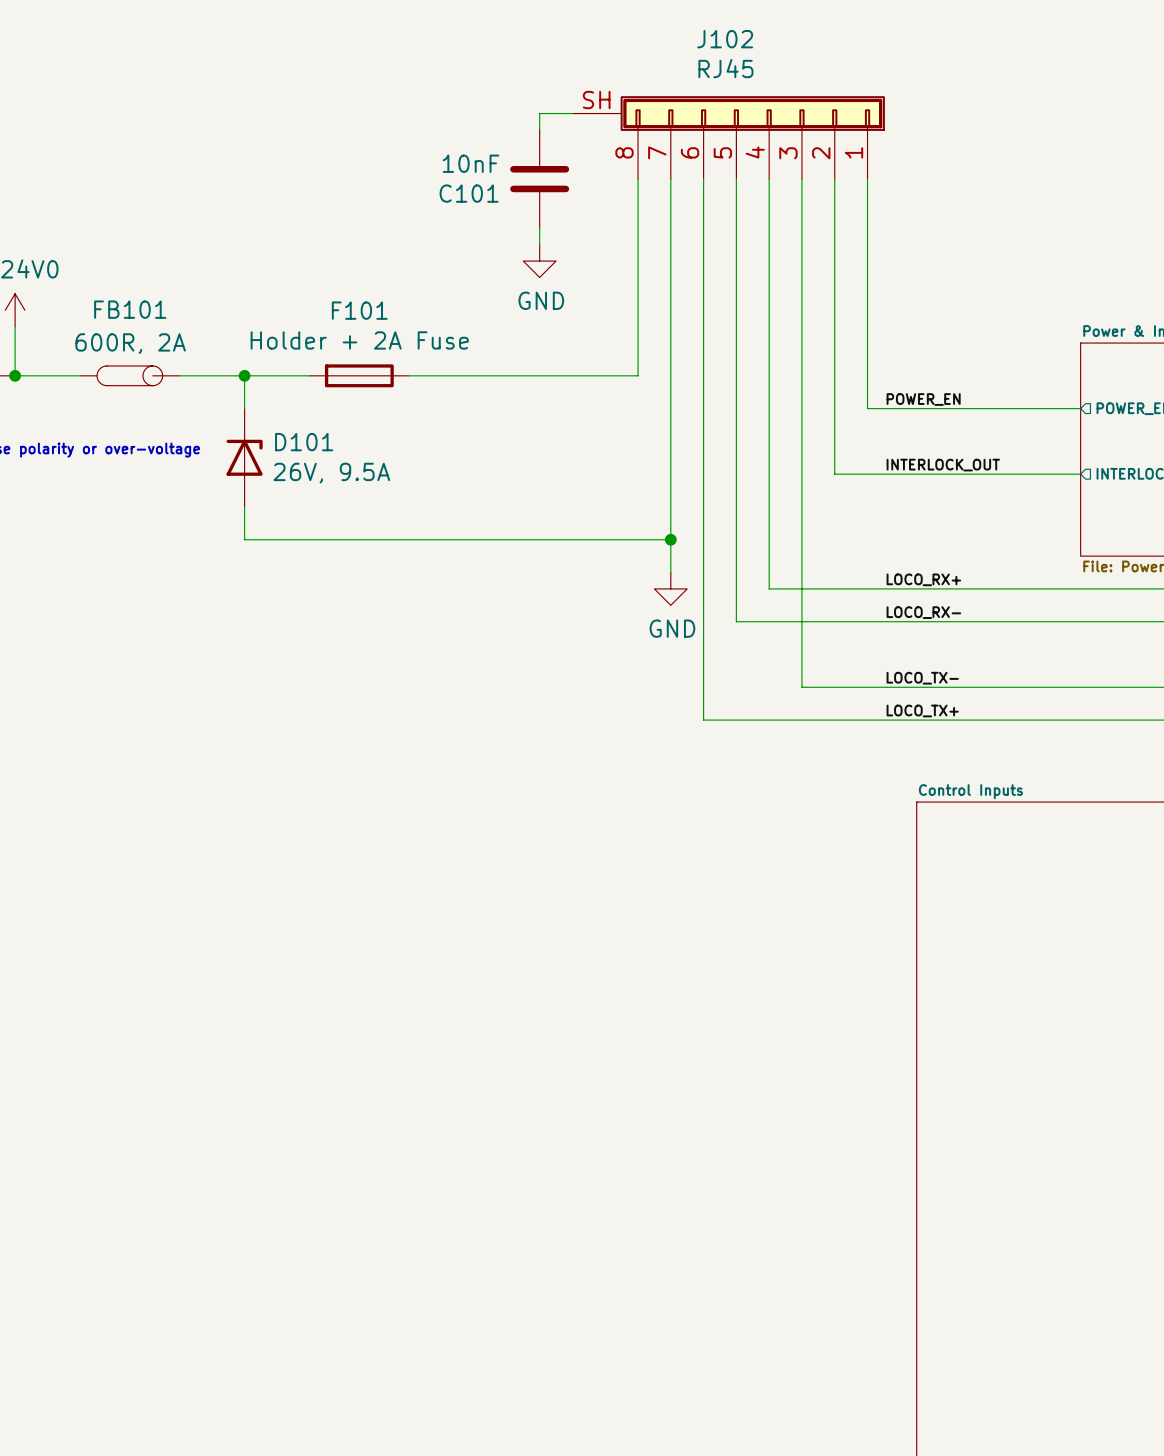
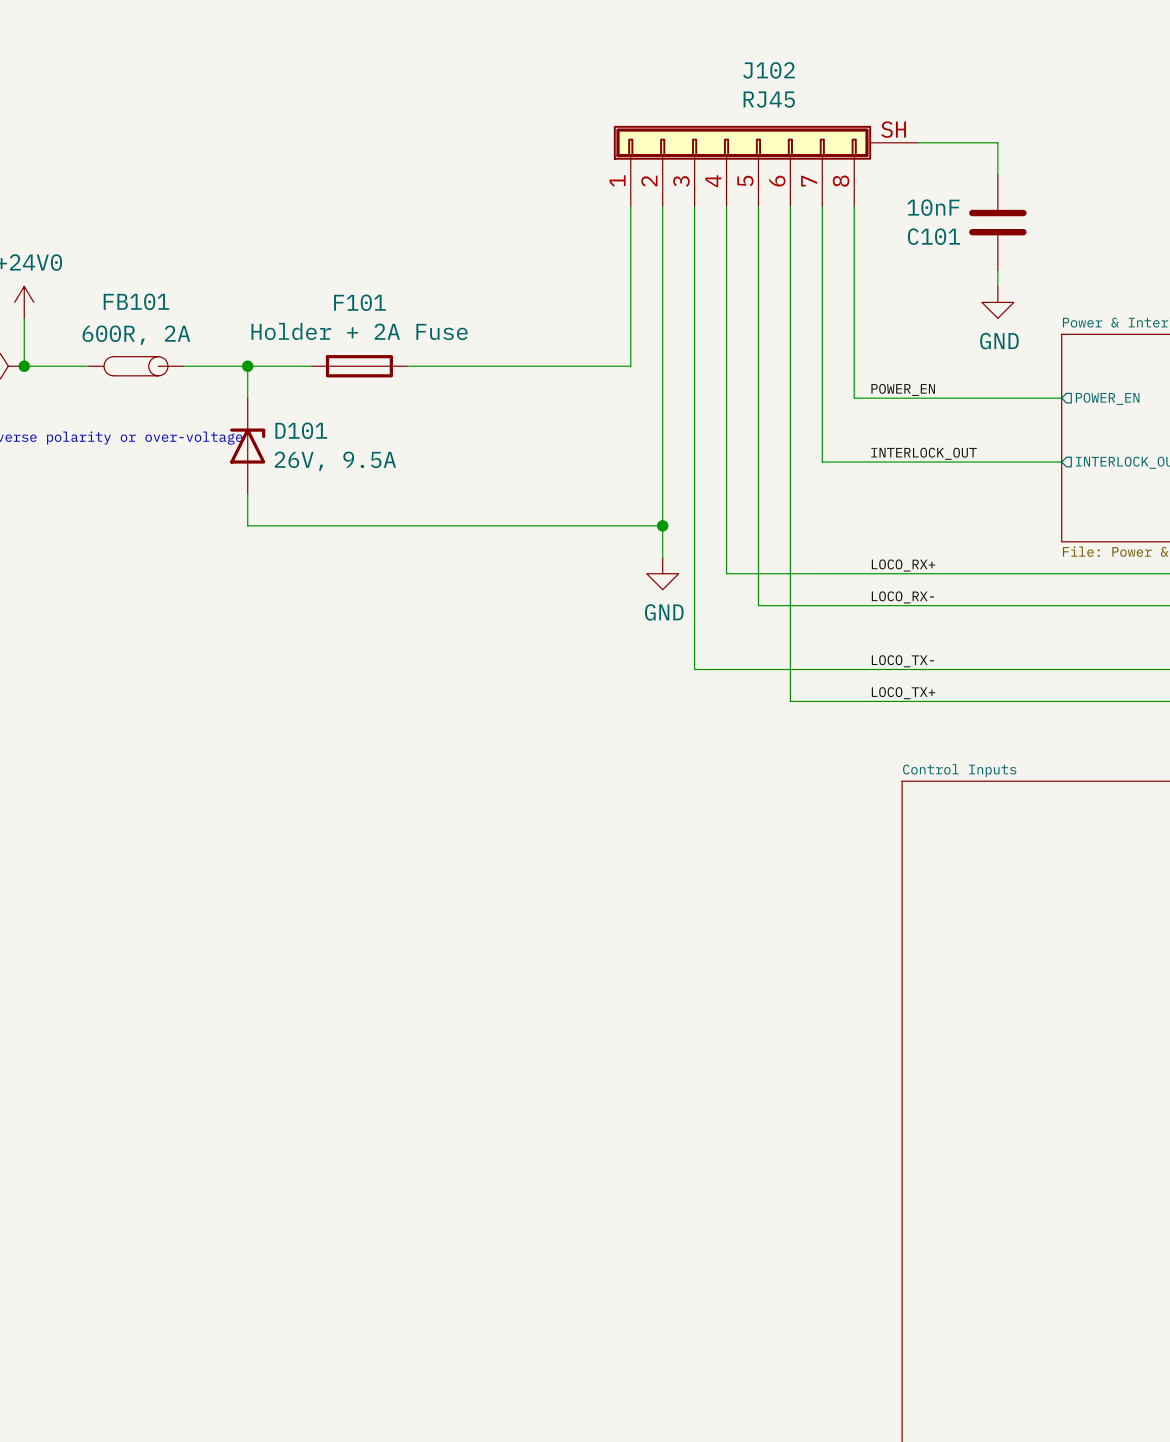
wire: (572, 113) (539, 113) (539, 129) -> none
J102 flip: as is (752, 113) -> left-right (742, 142)
wire: none -> (918, 142) (997, 142) (997, 174)
C101 position: (539, 179) -> (997, 222)
wire: (539, 228) (539, 244) -> none
power symbol: GND (539, 261) -> none
wire: none -> (997, 270) (997, 286)
power symbol: none -> GND (997, 302)
wire: (736, 588) (736, 621) (769, 621) -> (726, 573) (758, 573) (758, 605)
wire: (703, 687) (703, 720) (801, 720) -> (694, 669) (790, 669) (790, 701)

